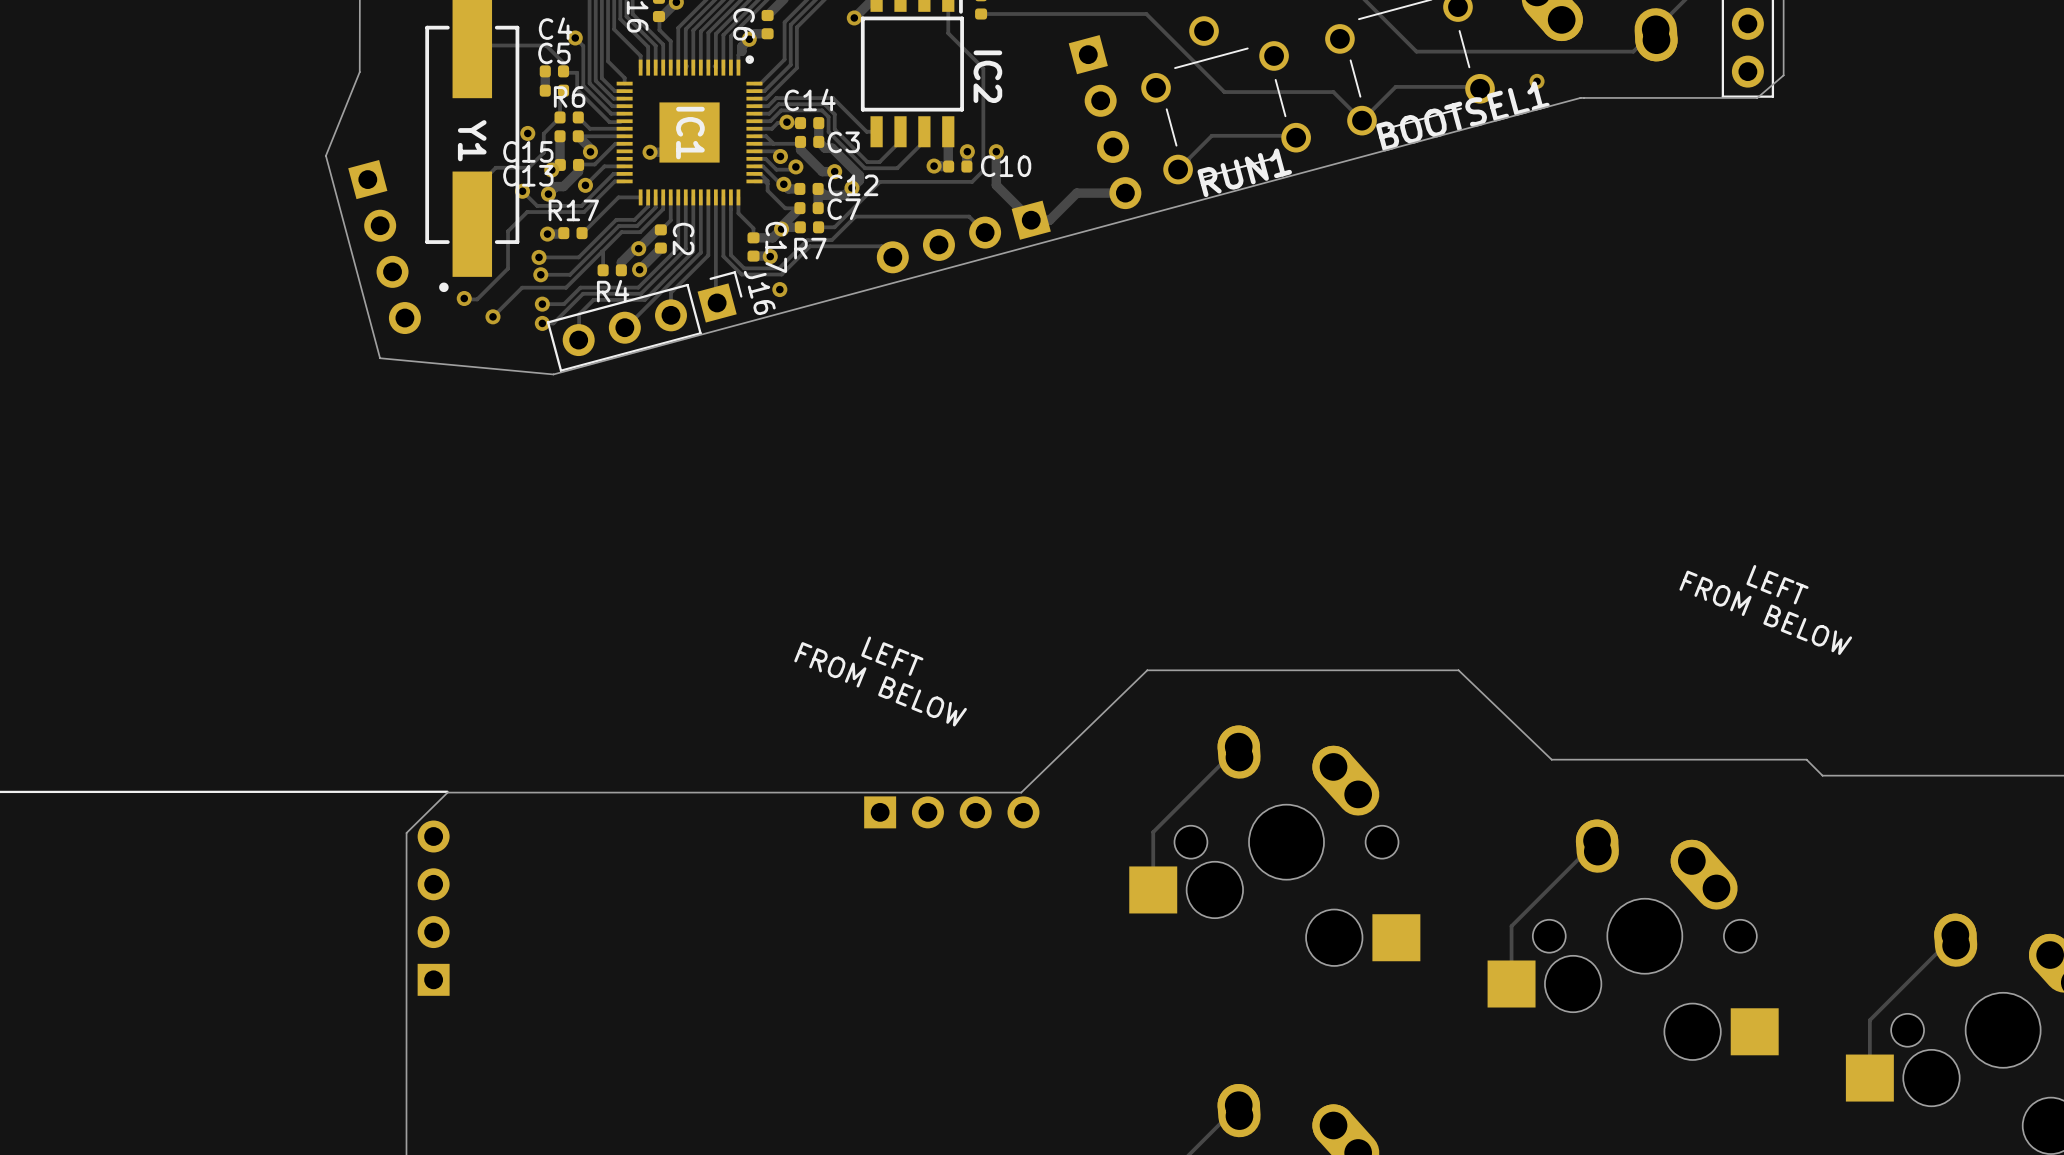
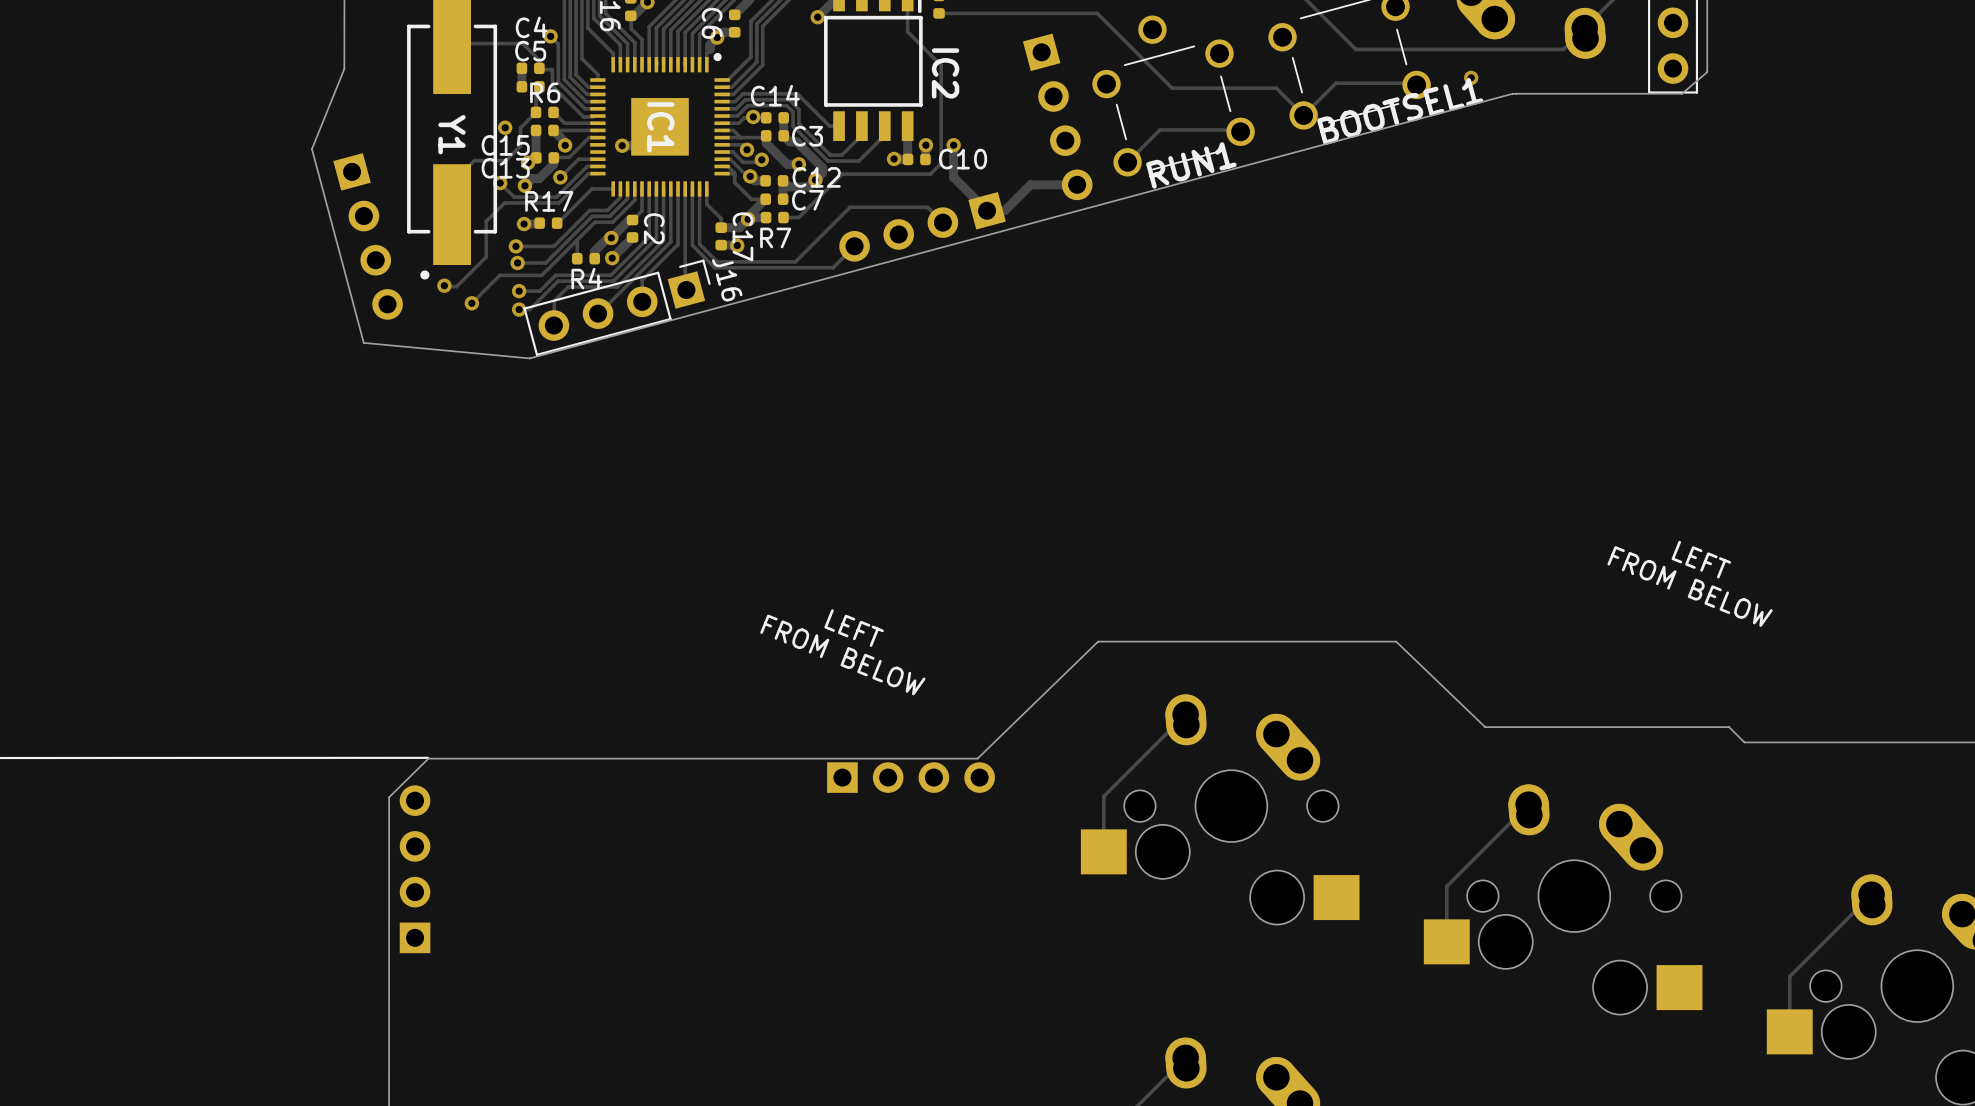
track: (888, 216) (855, 216) (831, 240) (807, 240) (779, 268) (744, 268) -> (850, 207) (795, 261) (717, 261) (712, 256)
track: (892, 257) (881, 246) (809, 246) (781, 274) (741, 274) -> (854, 246) (833, 267) (714, 267) (709, 262)
via: (779, 289) -> none

